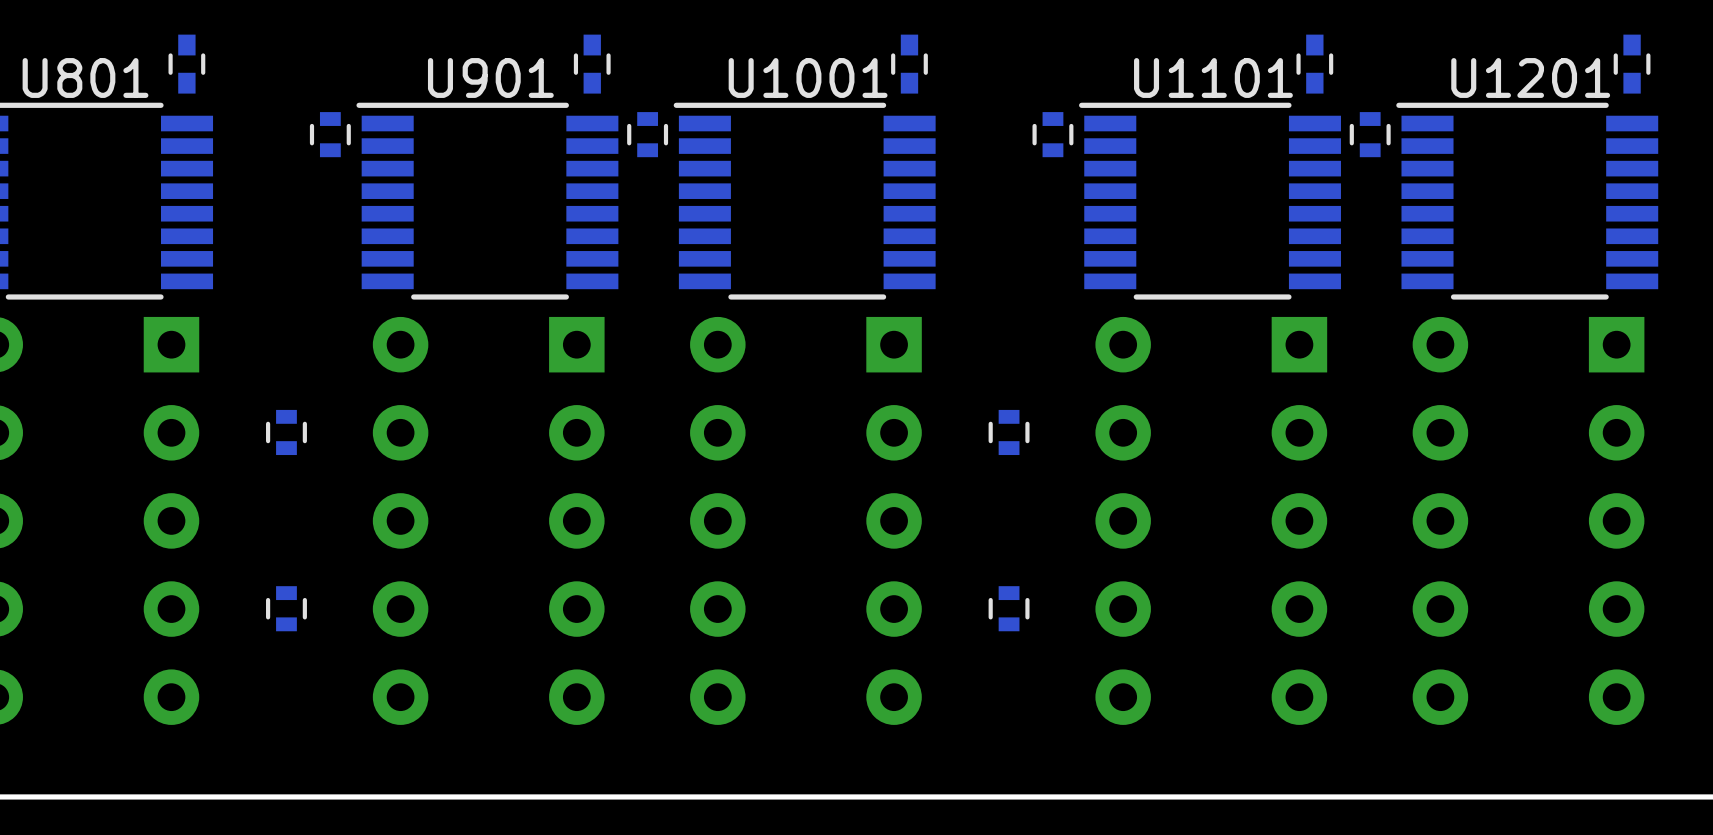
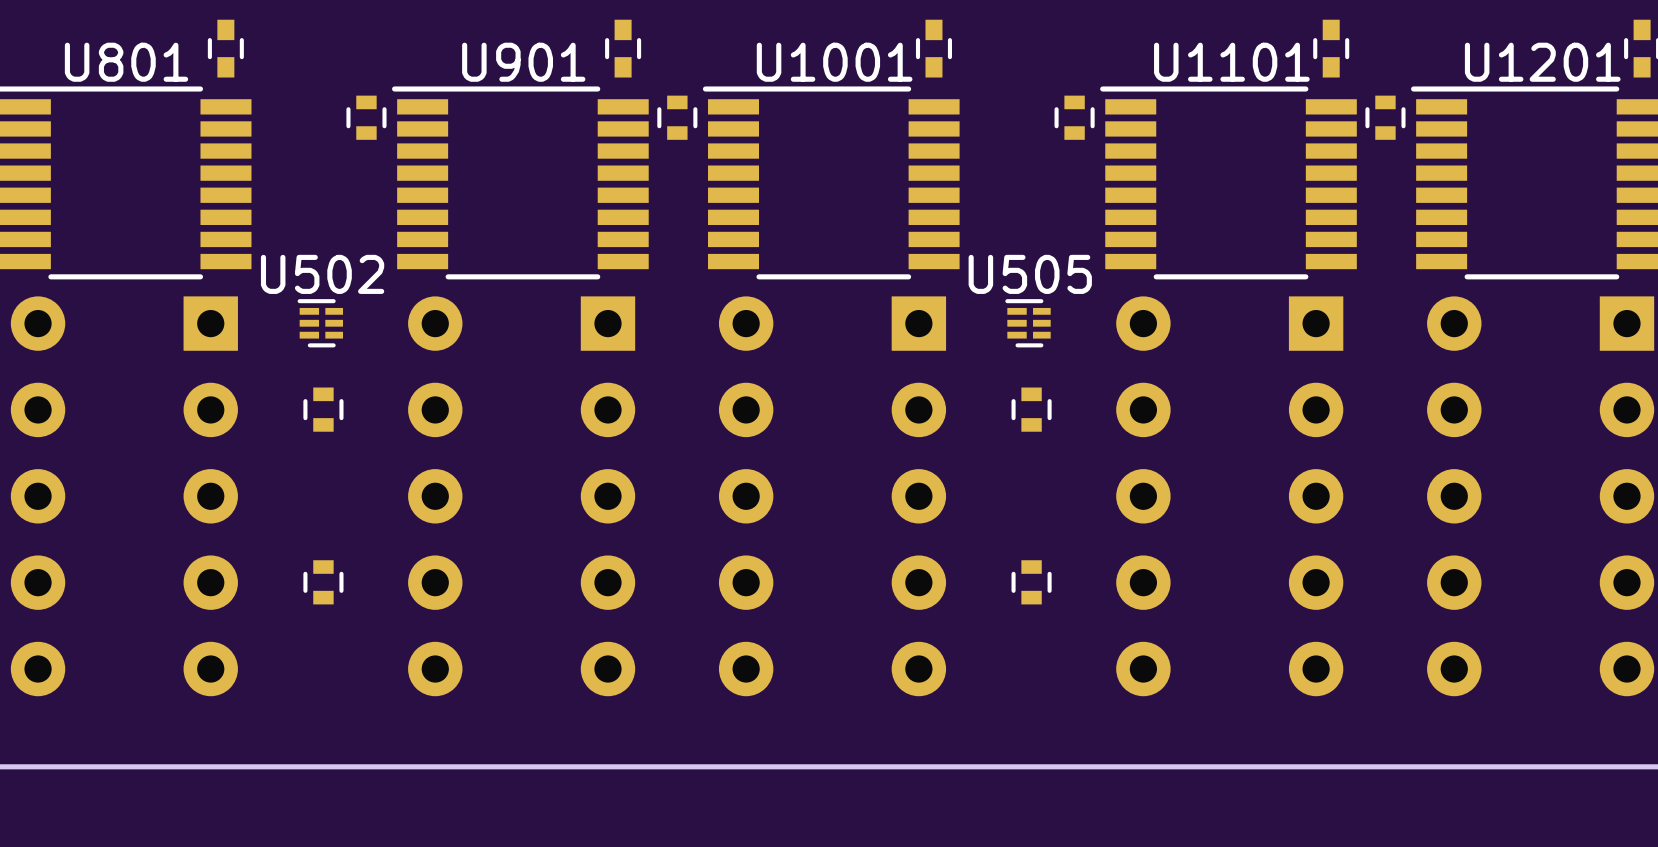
U502: none -> (320, 323)
U505: none -> (1028, 323)

